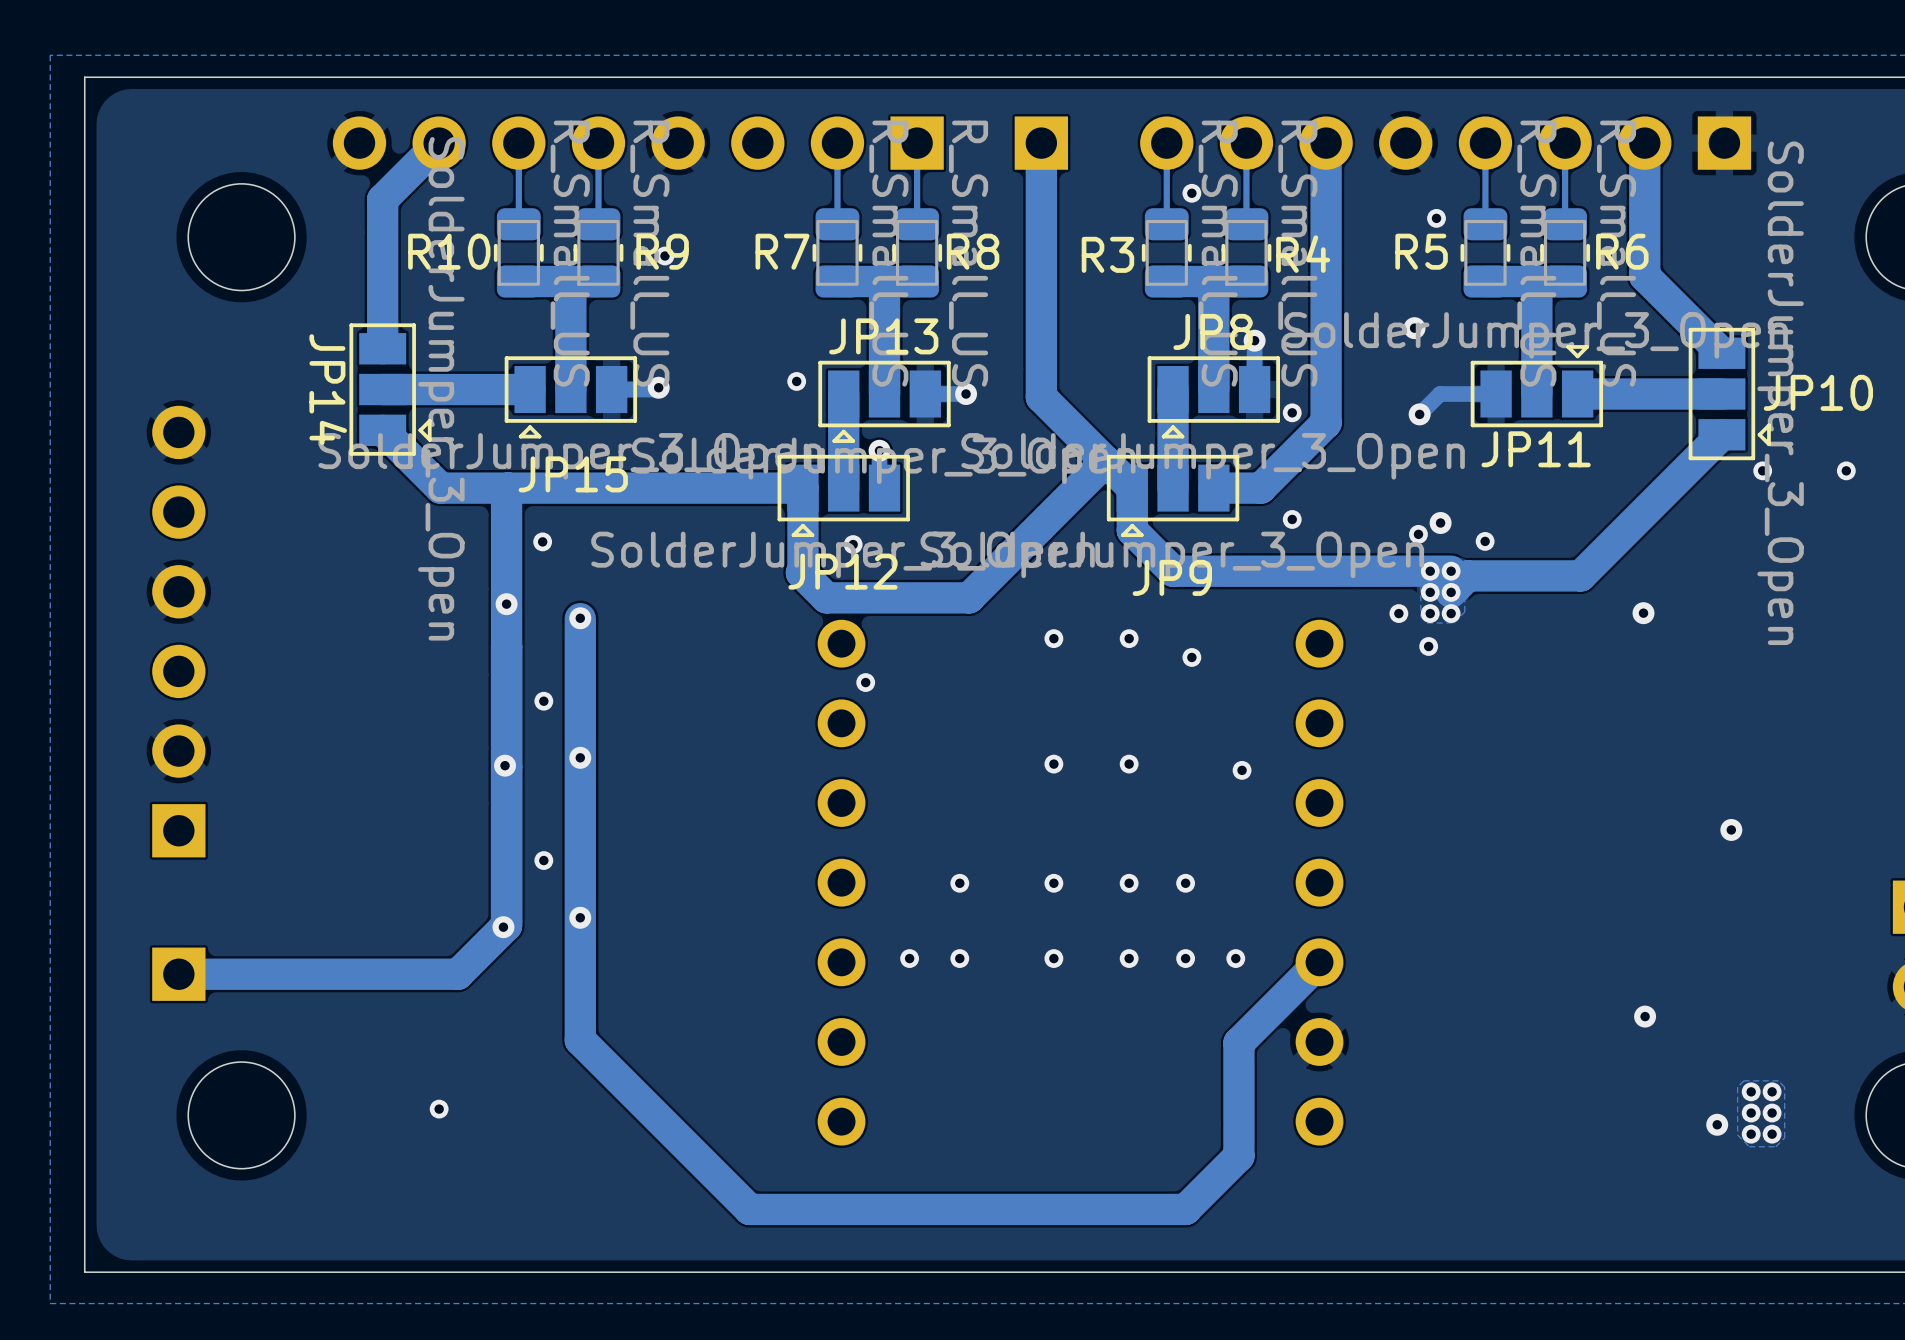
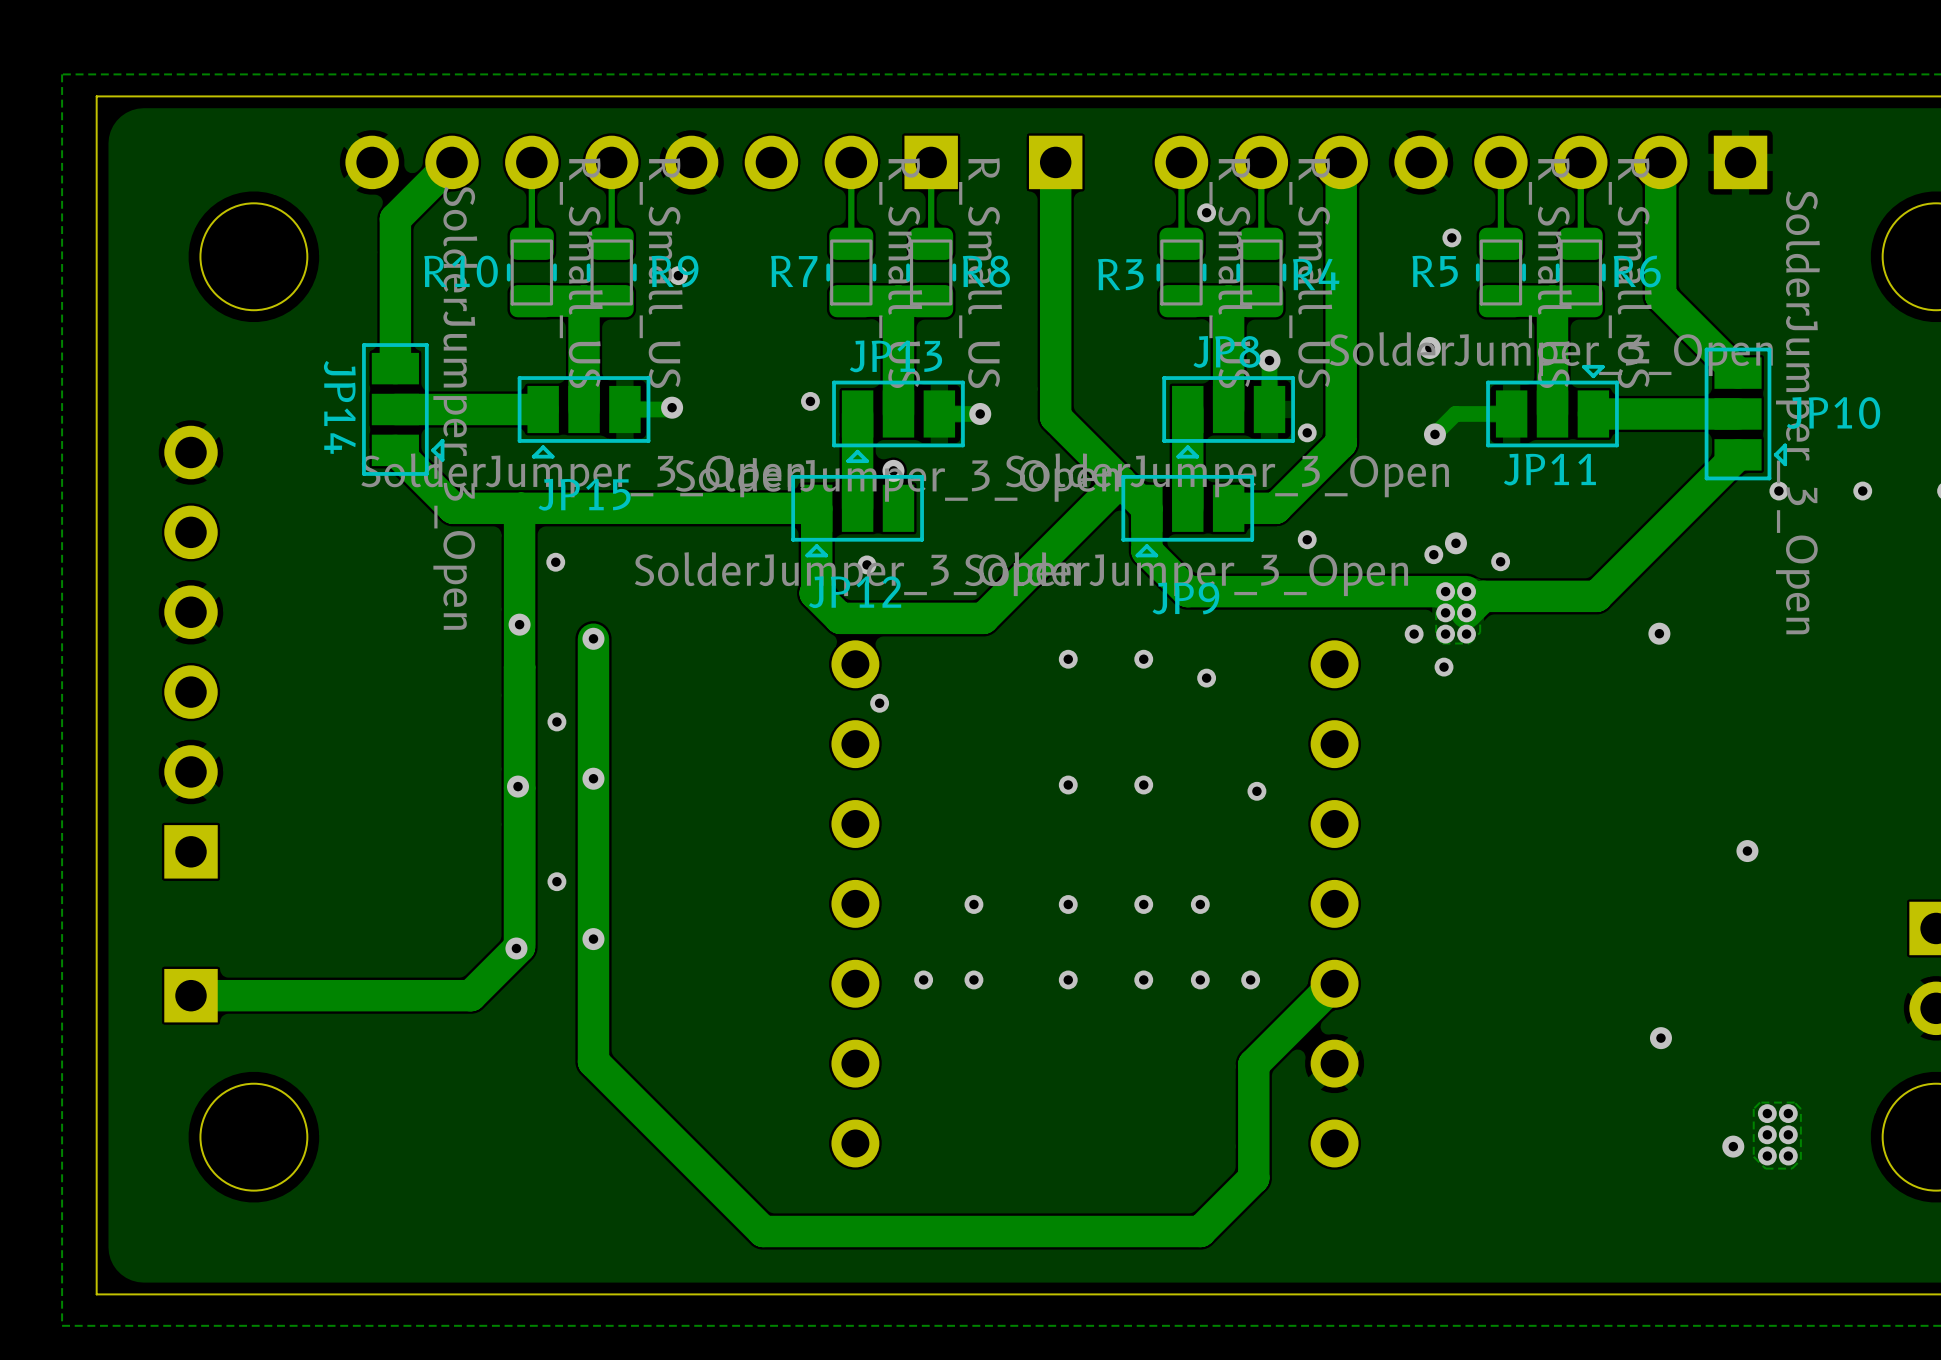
via: (439, 1109) -> none

